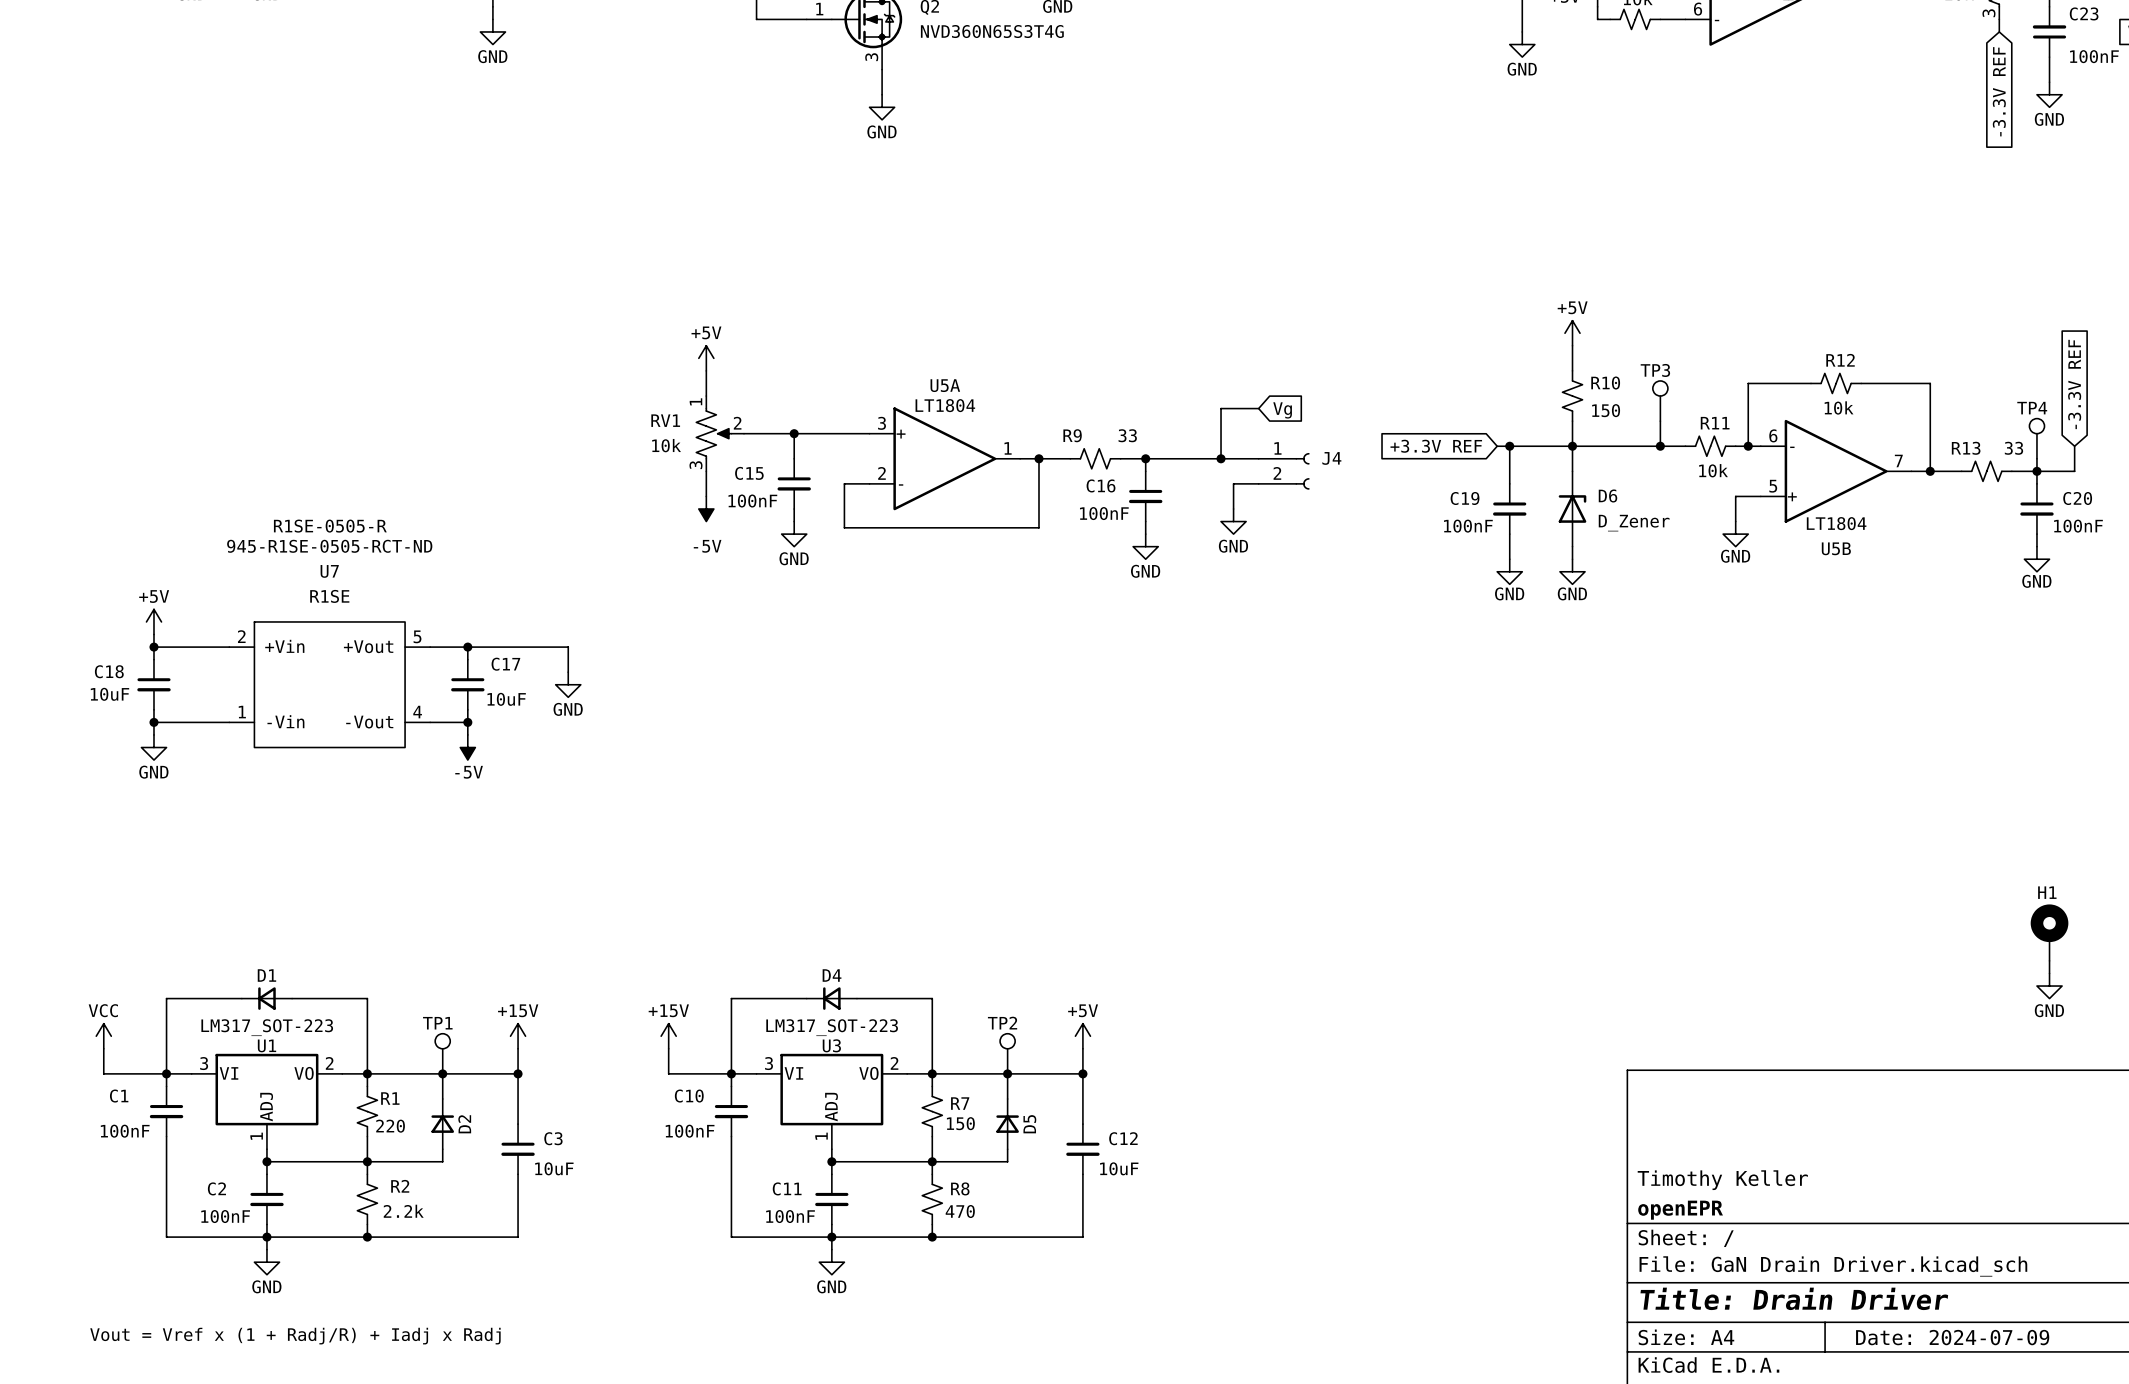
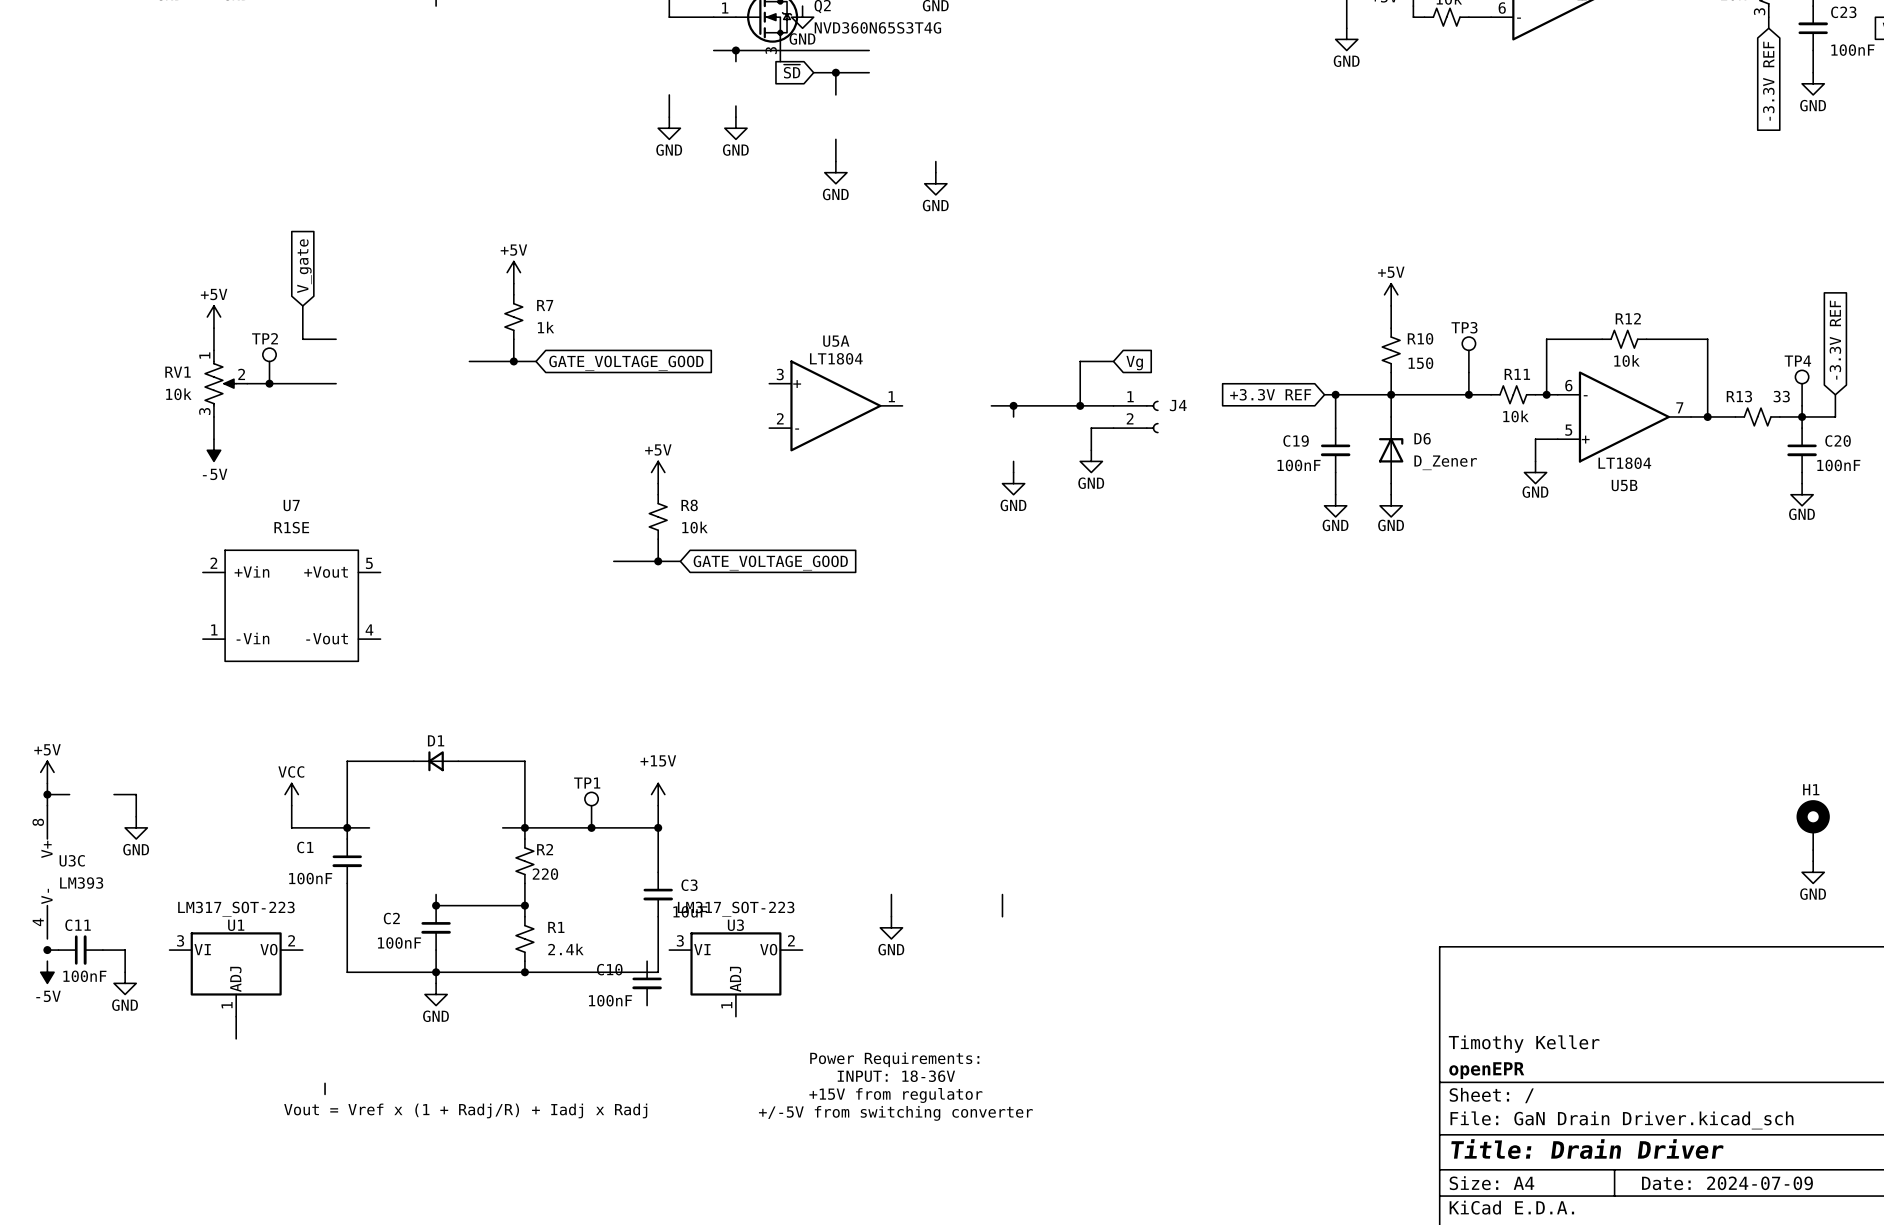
wire: (492, 6) (492, 19) -> none
power symbol: none -> GND (802, 17)
power symbol: GND (492, 31) -> none
wire: none -> (713, 50) (869, 50)
wire: none -> (735, 50) (735, 61)
junction: none -> (735, 50)
wire: (882, 69) (882, 94) -> (835, 72) (835, 94)
global label: none -> ~{SD} (792, 71)
wire: none -> (813, 72) (869, 72)
junction: none -> (835, 72)
wire: none -> (669, 94) (669, 117)
power symbol: GND (882, 107) -> none
wire: none -> (735, 106) (735, 117)
power symbol: none -> GND (669, 128)
power symbol: none -> GND (735, 128)
wire: none -> (835, 139) (835, 161)
wire: none -> (935, 161) (935, 172)
power symbol: none -> GND (835, 172)
power symbol: none -> GND (935, 183)
global label: none -> V_gate (304, 266)
power symbol: none -> +5V (513, 272)
wire: none -> (513, 283) (513, 294)
wire: none -> (302, 305) (302, 339) (336, 339)
power symbol: none -> +5V (213, 317)
power symbol: +5V (706, 358) -> none
wire: none -> (213, 328) (213, 350)
wire: (706, 370) (706, 396) -> (513, 339) (513, 361)
wire: none -> (469, 361) (536, 361)
junction: none -> (513, 361)
global label: none -> GATE_VOLTAGE_GOOD (626, 363)
wire: none -> (247, 383) (336, 383)
junction: none -> (269, 383)
RV1 position: (720, 433) -> (226, 383)
wire: (743, 433) (869, 433) -> none
wire: (794, 433) (794, 458) -> none
junction: (794, 433) -> none
wire: (1020, 458) (1070, 458) -> none
wire: (1038, 458) (1038, 527) (844, 527) (844, 483) (869, 483) -> none
junction: (1038, 458) -> none
R9: 33 (1095, 458) -> none
wire: (706, 471) (706, 496) -> (658, 539) (658, 561)
C15: 100nF (794, 483) -> none
C16: 100nF (1145, 496) -> none
power symbol: none -> -5V (213, 450)
power symbol: -5V (706, 509) -> none
wire: (794, 509) (794, 521) -> (658, 483) (658, 494)
text: R1SE-0505-R (330, 526) -> none
power symbol: none -> +5V (658, 472)
power symbol: GND (794, 534) -> none
text: 945-R1SE-0505-RCT-ND (329, 546) -> none
power symbol: +5V (153, 621) -> none
wire: (153, 634) (153, 659) -> (213, 416) (213, 439)
wire: none -> (613, 561) (680, 561)
junction: none -> (658, 561)
global label: none -> GATE_VOLTAGE_GOOD (770, 563)
wire: (153, 647) (229, 647) -> none
junction: (153, 647) -> none
wire: (430, 647) (568, 647) (568, 672) -> none
wire: (467, 647) (467, 659) -> none
junction: (467, 647) -> none
C18: 10uF (153, 684) -> none
C17: 10uF (467, 684) -> none
power symbol: GND (568, 684) -> none
wire: (153, 709) (153, 734) -> (47, 783) (47, 805)
wire: (467, 709) (467, 734) -> none
wire: (153, 722) (229, 722) -> none
junction: (153, 722) -> none
wire: (430, 722) (467, 722) -> none
junction: (467, 722) -> none
power symbol: GND (153, 747) -> none
power symbol: -5V (467, 747) -> none
wire: none -> (413, 761) (347, 761) (347, 839)
wire: none -> (458, 761) (524, 761) (524, 839)
power symbol: none -> +5V (47, 772)
wire: none -> (47, 794) (69, 794)
junction: none -> (47, 794)
wire: none -> (114, 794) (136, 794) (136, 816)
power symbol: none -> VCC (291, 794)
power symbol: none -> +15V (658, 794)
wire: none -> (291, 805) (291, 827) (369, 827)
wire: none -> (658, 805) (658, 872)
power symbol: none -> GND (136, 827)
junction: none -> (347, 827)
wire: none -> (502, 827) (658, 827)
junction: none -> (524, 827)
junction: none -> (591, 827)
junction: none -> (658, 827)
U3C: none -> LM393 (47, 872)
wire: (241, 998) (166, 998) (166, 1086) -> none
D1 position: (266, 998) -> (436, 761)
wire: (292, 998) (367, 998) (367, 1086) -> none
wire: none -> (347, 883) (347, 972) (658, 972) (658, 916)
wire: none -> (524, 883) (524, 916)
wire: (806, 998) (731, 998) (731, 1086) -> none
D4: (831, 998) -> none
wire: (856, 998) (932, 998) (932, 1086) -> none
wire: none -> (436, 894) (436, 905) (524, 905)
junction: none -> (436, 905)
junction: none -> (524, 905)
power symbol: VCC (103, 1036) -> none
power symbol: +15V (518, 1036) -> none
power symbol: +15V (668, 1036) -> none
power symbol: +5V (1082, 1036) -> none
wire: (103, 1048) (103, 1073) (116, 1073) -> none
wire: (518, 1048) (518, 1124) -> none
wire: (668, 1048) (668, 1073) (756, 1073) -> none
power symbol: none -> GND (891, 927)
wire: (1082, 1048) (1082, 1124) -> none
TP1 position: (442, 1053) -> (591, 810)
TP2 position: (1007, 1053) -> (269, 365)
wire: none -> (47, 950) (58, 950)
junction: none -> (47, 950)
wire: (141, 1073) (191, 1073) -> (125, 950) (125, 972)
junction: (166, 1073) -> none
wire: (342, 1073) (518, 1073) -> none
junction: (367, 1073) -> none
wire: (442, 1073) (442, 1099) -> none
junction: (442, 1073) -> none
junction: (518, 1073) -> none
junction: (731, 1073) -> none
wire: (907, 1073) (1082, 1073) -> none
junction: (932, 1073) -> none
wire: (1007, 1073) (1007, 1099) -> (1002, 894) (1002, 916)
junction: (1007, 1073) -> none
junction: (1082, 1073) -> none
wire: none -> (524, 961) (524, 972)
R1 name position: R1 (390, 1098) -> R1 (556, 927)
power symbol: none -> -5V (47, 972)
junction: none -> (436, 972)
junction: none -> (524, 972)
R7 name position: R7 (960, 1103) -> R7 (545, 305)
power symbol: none -> GND (125, 983)
C1 position: (166, 1111) -> (347, 861)
R1 position: (367, 1111) -> (524, 938)
R7 position: (932, 1111) -> (513, 317)
R7 value: 150 (960, 1123) -> 1k (546, 327)
D2: (442, 1124) -> none
power symbol: none -> GND (436, 994)
D5: (1007, 1124) -> none
R1 value: 220 (390, 1126) -> 2.4k (565, 949)
wire: (166, 1136) (166, 1237) (518, 1237) (518, 1174) -> none
wire: (367, 1136) (367, 1174) -> (436, 950) (436, 983)
wire: (731, 1136) (731, 1237) (1082, 1237) (1082, 1174) -> none
wire: (932, 1136) (932, 1174) -> none
wire: (442, 1149) (442, 1161) (266, 1161) -> none
C3 position: (518, 1149) -> (658, 894)
wire: (831, 1149) (831, 1174) -> (891, 894) (891, 916)
wire: (1007, 1149) (1007, 1161) (831, 1161) -> none
C12: 10uF (1082, 1149) -> none
junction: (266, 1161) -> none
junction: (367, 1161) -> none
junction: (831, 1161) -> none
junction: (932, 1161) -> none
R2 name position: R2 (400, 1186) -> R2 (545, 849)
C11 name position: C11 (787, 1188) -> C11 (78, 925)
R8 name position: R8 (960, 1188) -> R8 (689, 505)
text: none -> Power Requirements: (894, 1059)
C2 position: (266, 1199) -> (436, 927)
R2 position: (367, 1199) -> (524, 861)
C11 rotation: 0° (831, 1199) -> 90° counterclockwise (80, 950)
C11 position: (831, 1199) -> (80, 950)
R8 position: (932, 1199) -> (658, 516)
R2 value: 2.2k (403, 1211) -> 220 (545, 874)
R8 value: 470 (960, 1211) -> 10k (694, 527)
C11 value position: 100nF (790, 1216) -> 100nF (84, 976)
text: none -> INPUT: 18-36V (896, 1076)
wire: (266, 1224) (266, 1249) -> none
wire: (831, 1224) (831, 1249) -> none
wire: (932, 1224) (932, 1237) -> none
junction: (266, 1237) -> none
junction: (367, 1237) -> none
junction: (831, 1237) -> none
junction: (932, 1237) -> none
text: none -> +15V from regulator (895, 1095)
text: none -> +/-5V from switching converter (895, 1113)
power symbol: GND (266, 1262) -> none
power symbol: GND (831, 1262) -> none
text position: Vout = Vref x (1 + Radj/R) + Iadj x Radj (295, 1336) -> Vout = Vref x (1 + Radj/R) + Iadj x Radj (465, 1110)

